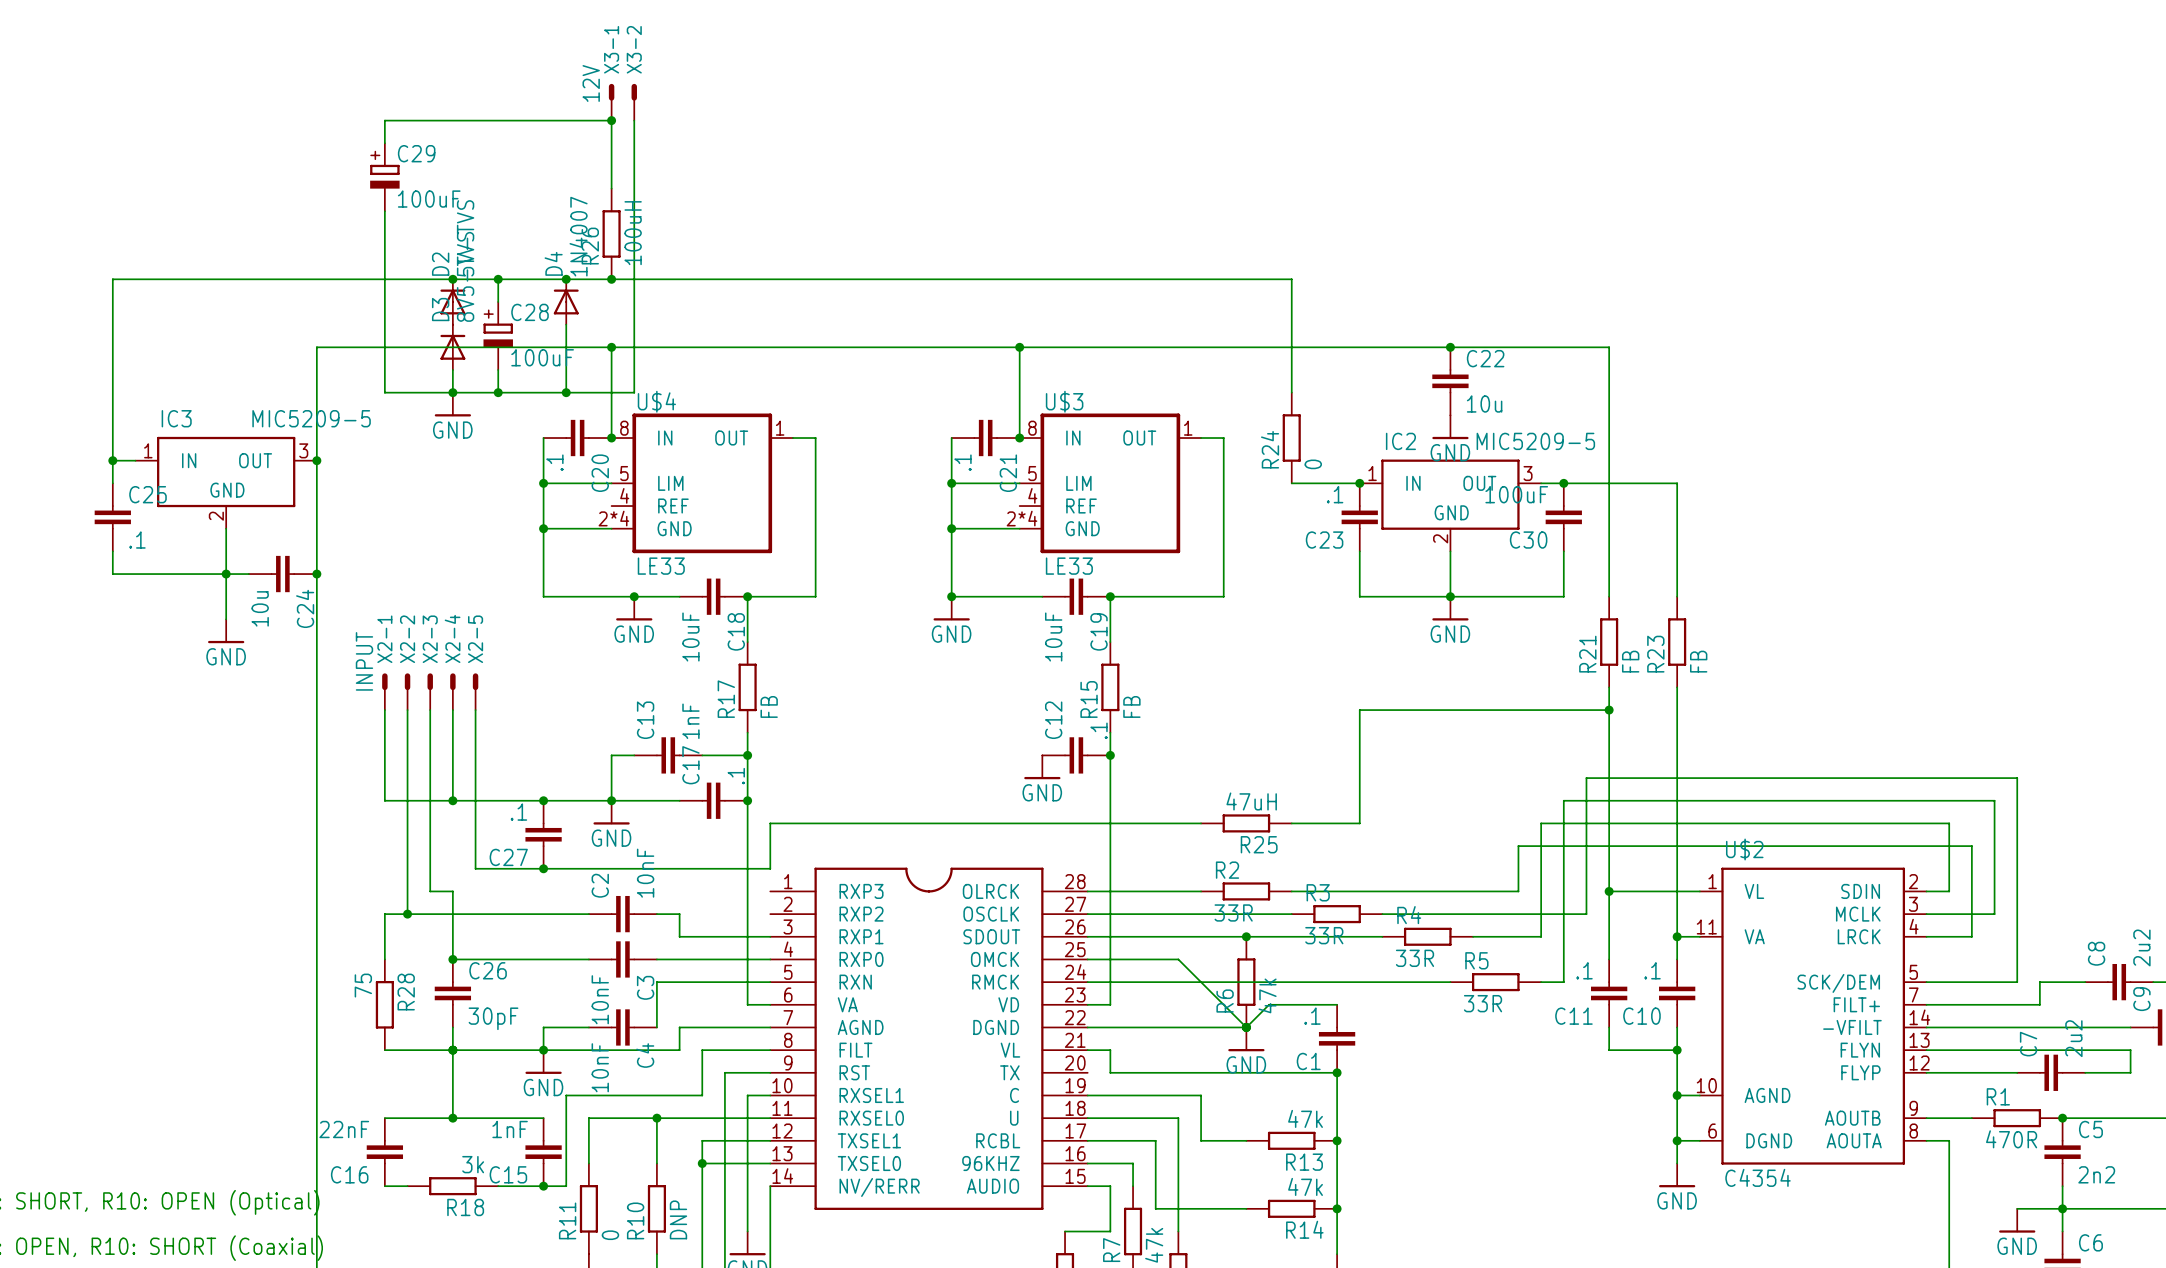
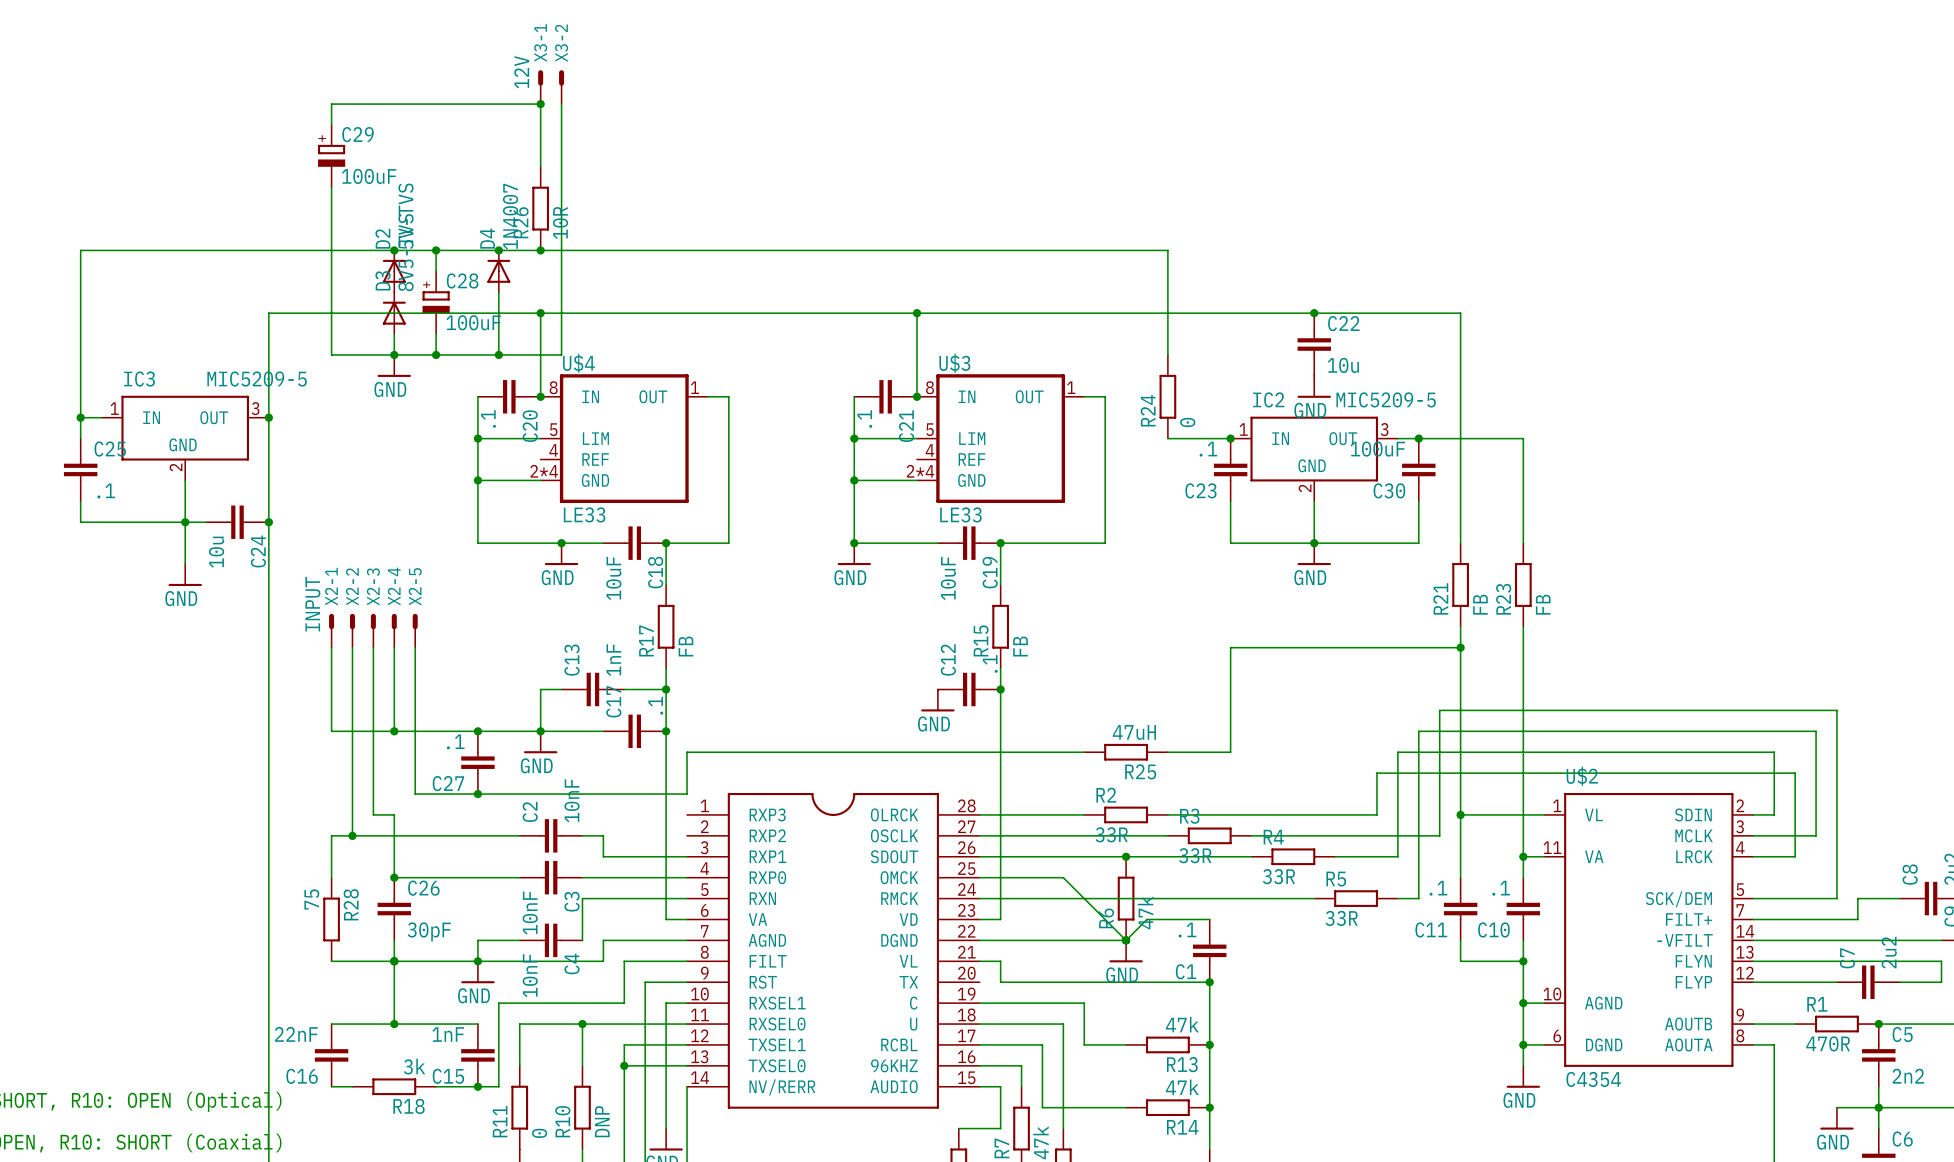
R26 value: 100uH (633, 233) -> 10R (560, 222)

